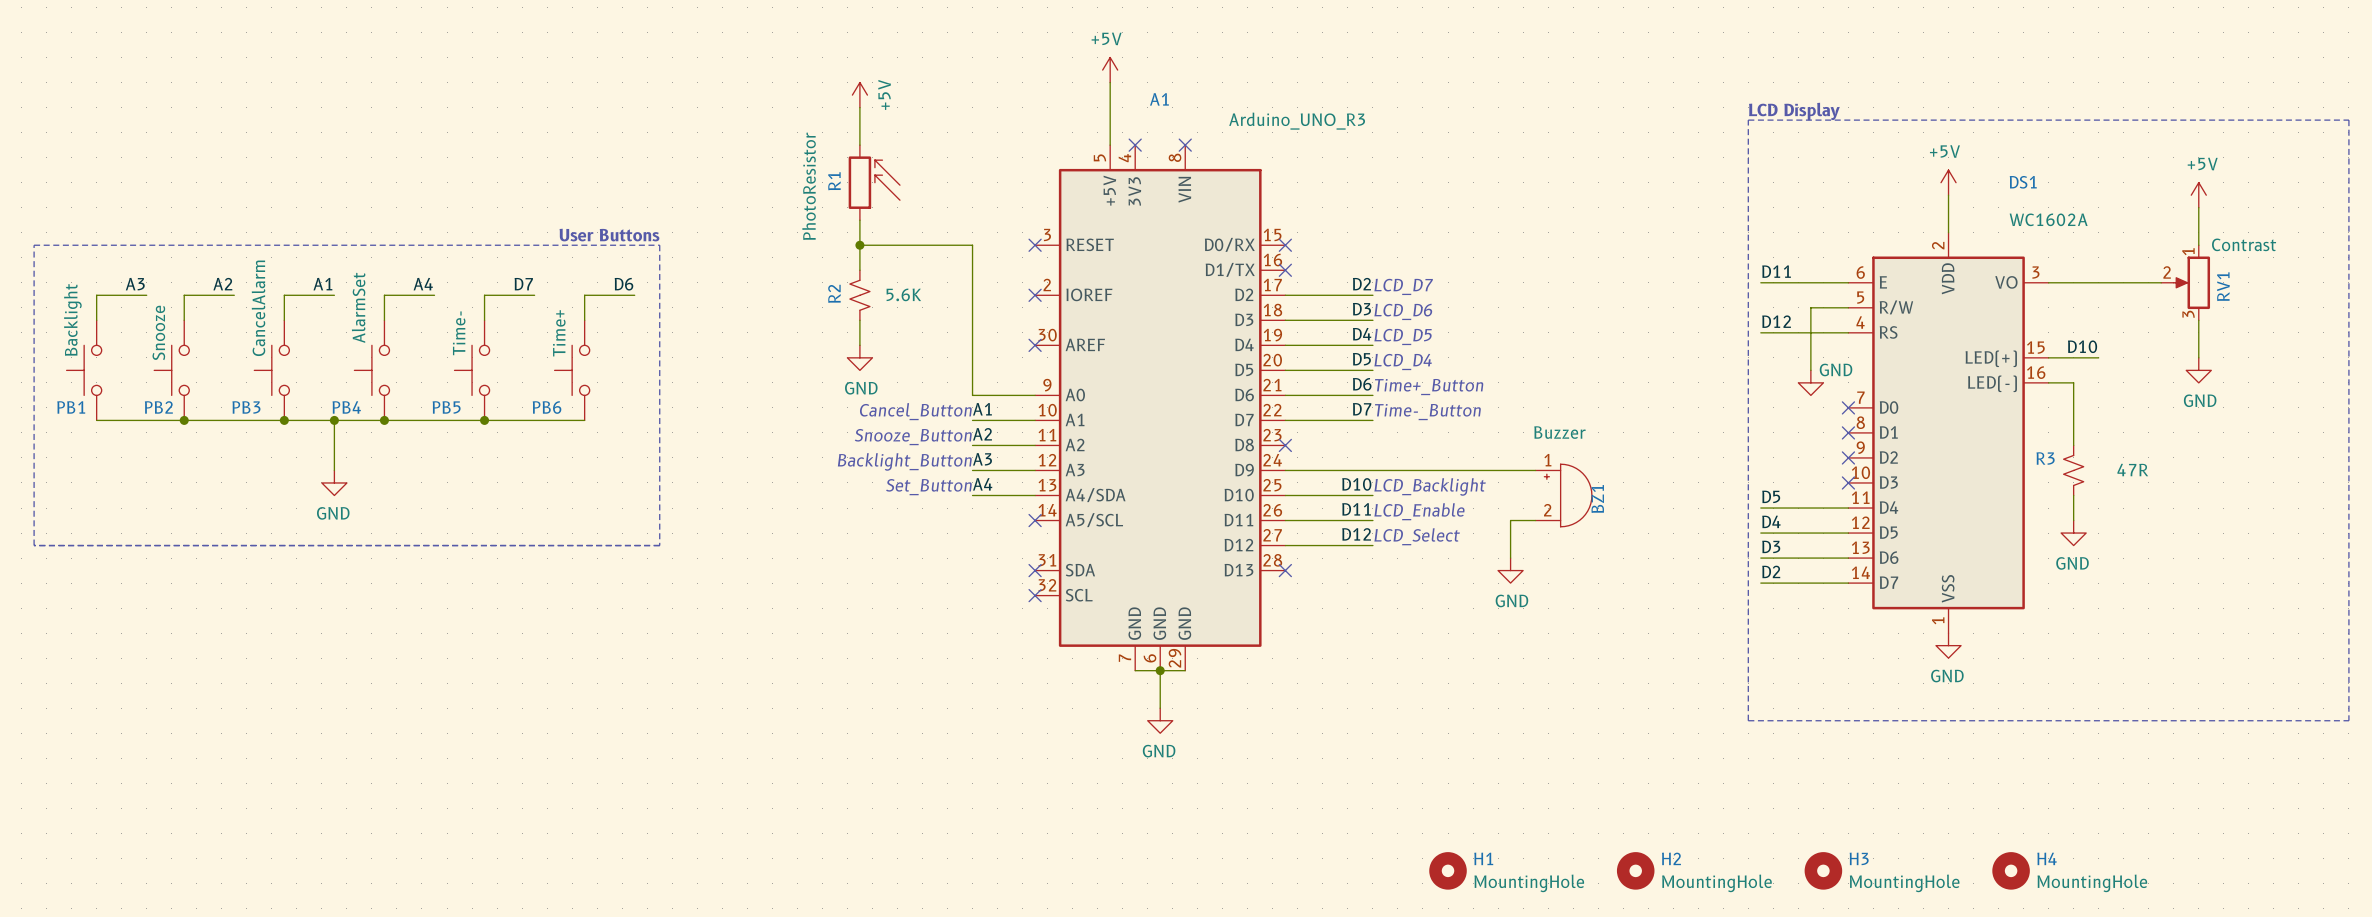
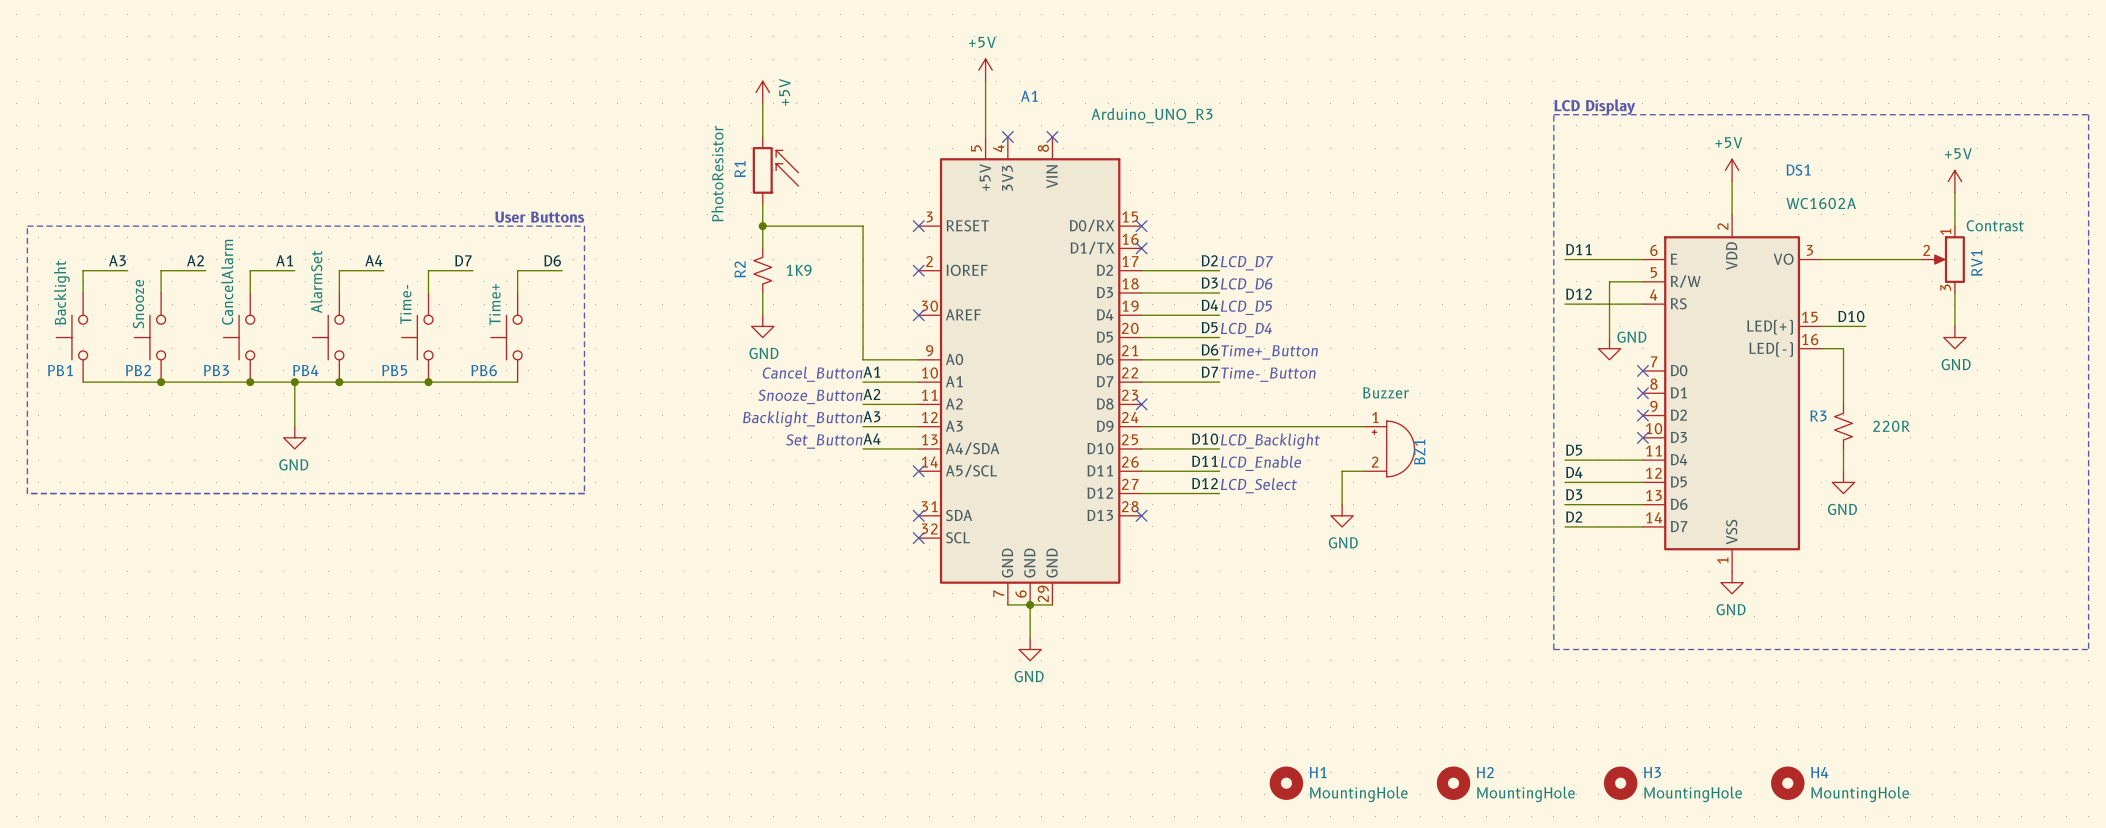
R2 value: 5.6K (903, 294) -> 1K9 (799, 270)
R3 value: 47R (2132, 470) -> 220R (1891, 426)

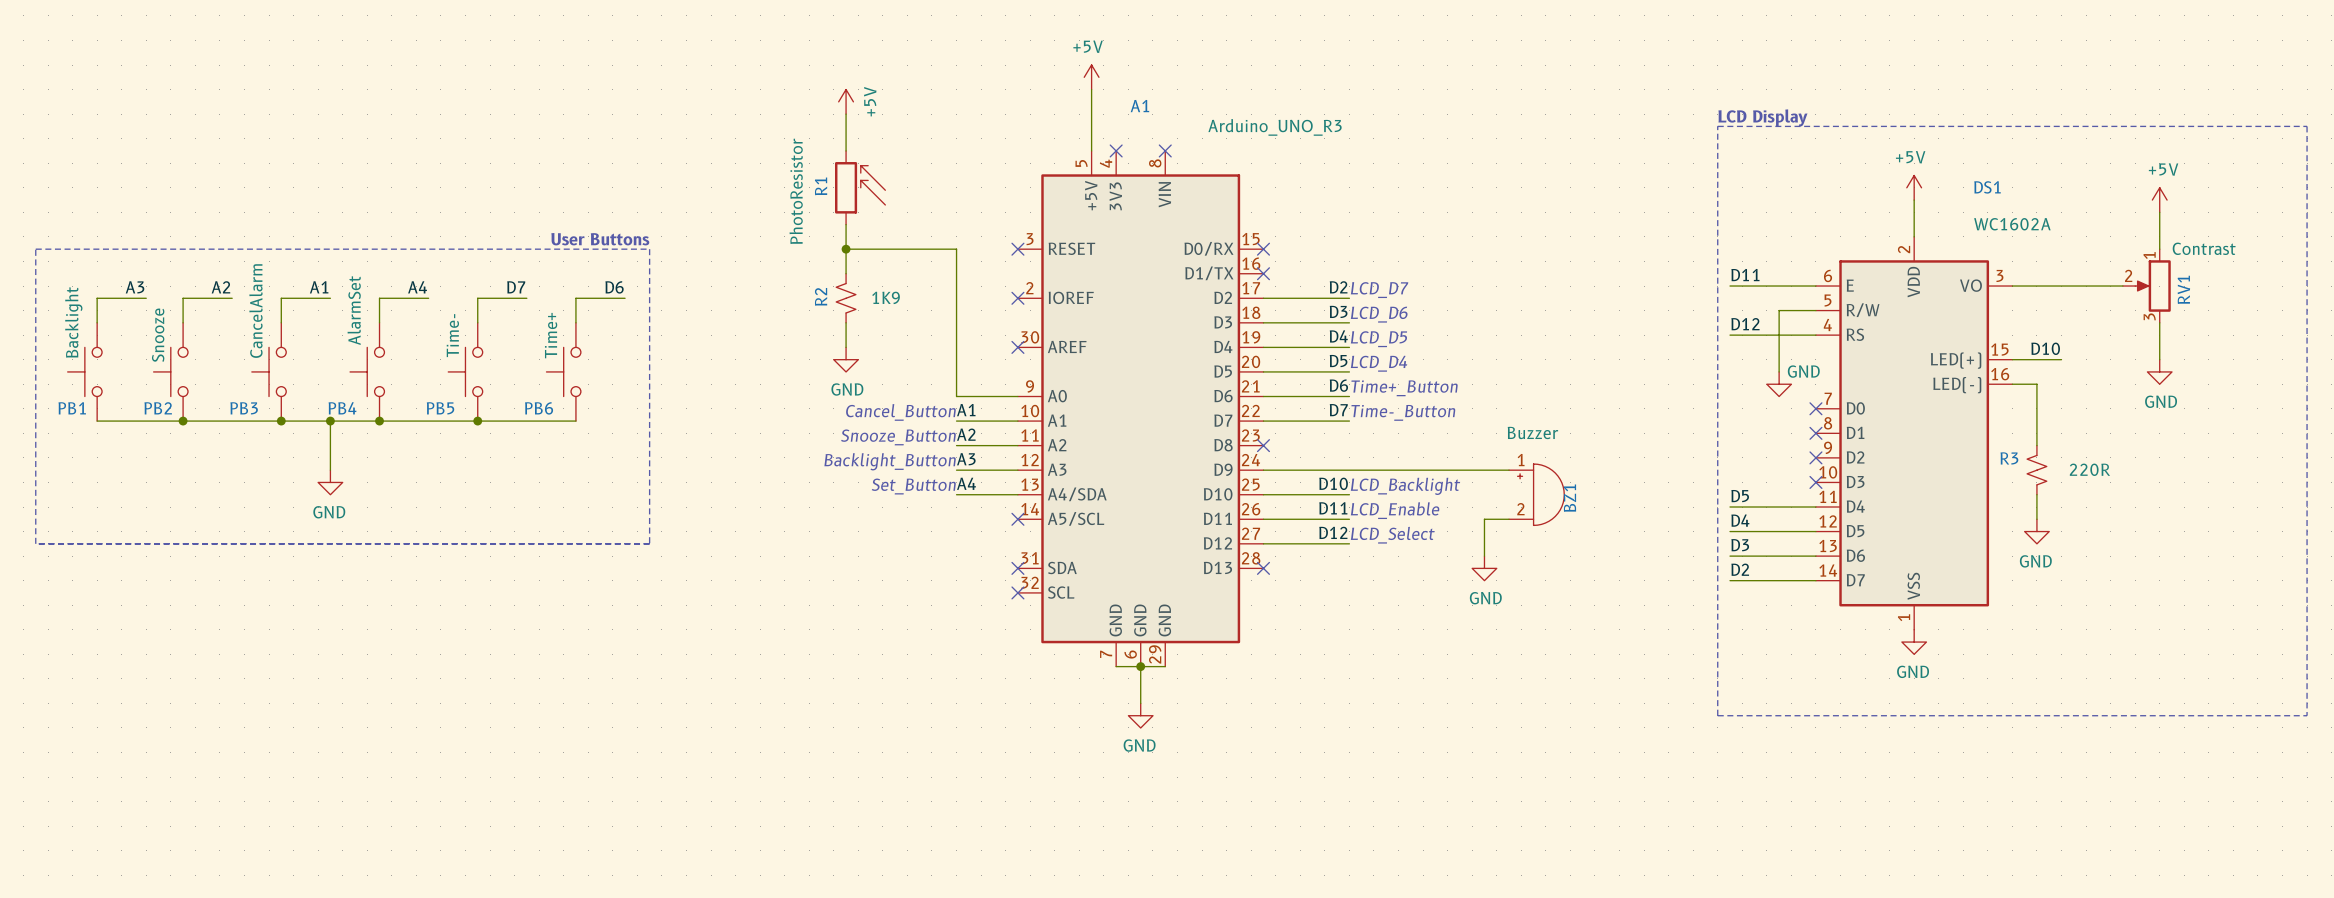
H1: MountingHole (1286, 783) -> none
H2: MountingHole (1453, 783) -> none
H3: MountingHole (1620, 783) -> none
H4: MountingHole (1787, 783) -> none

